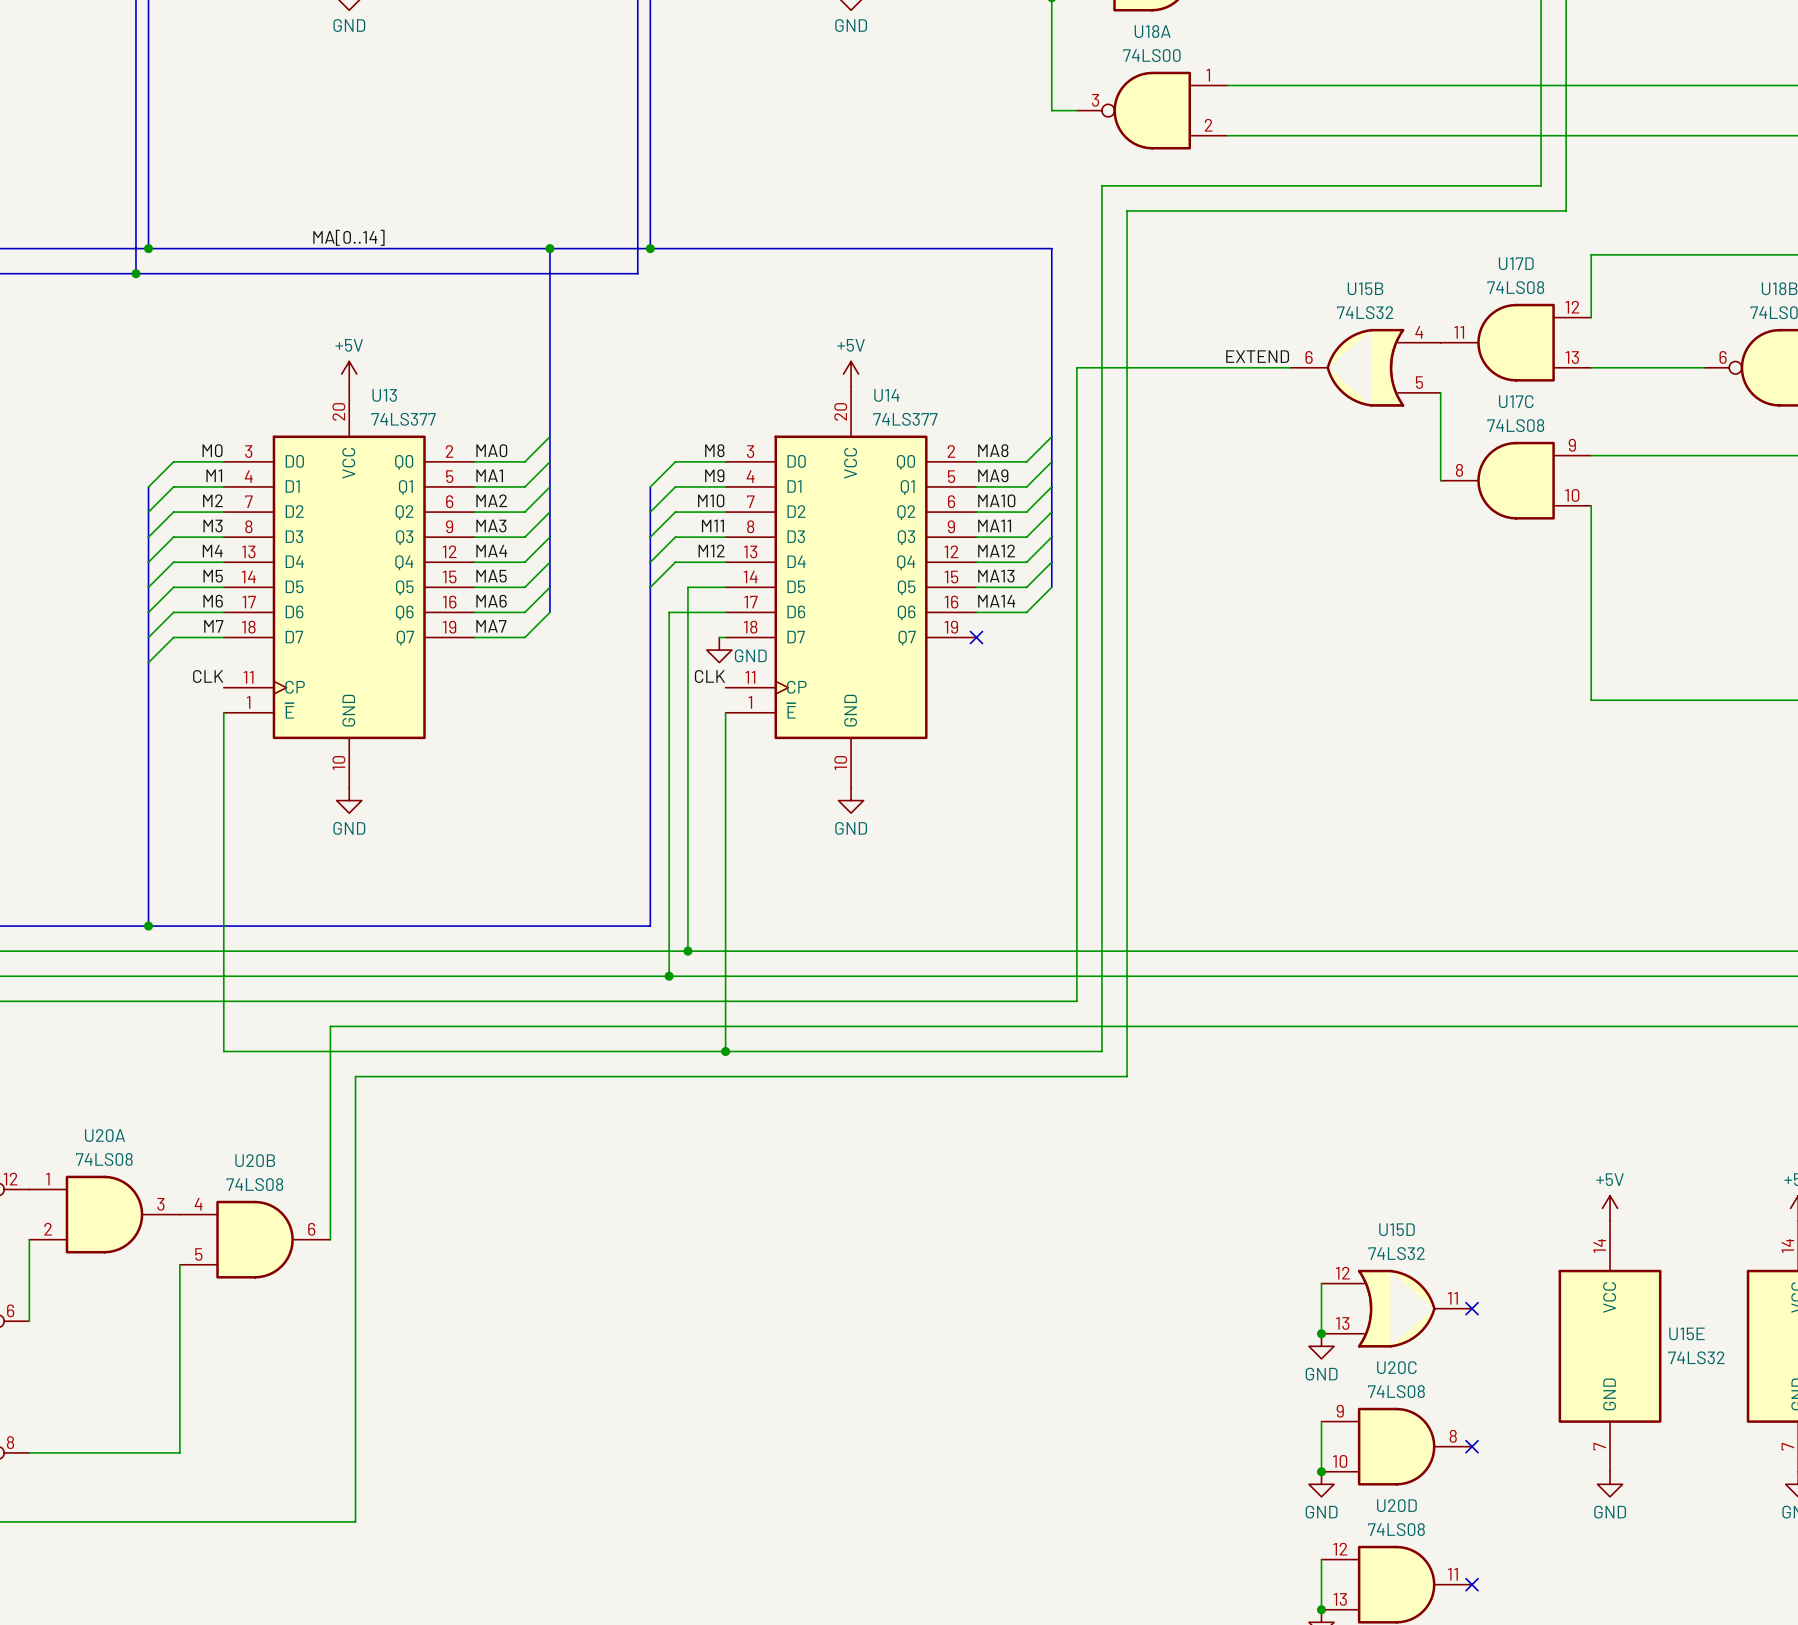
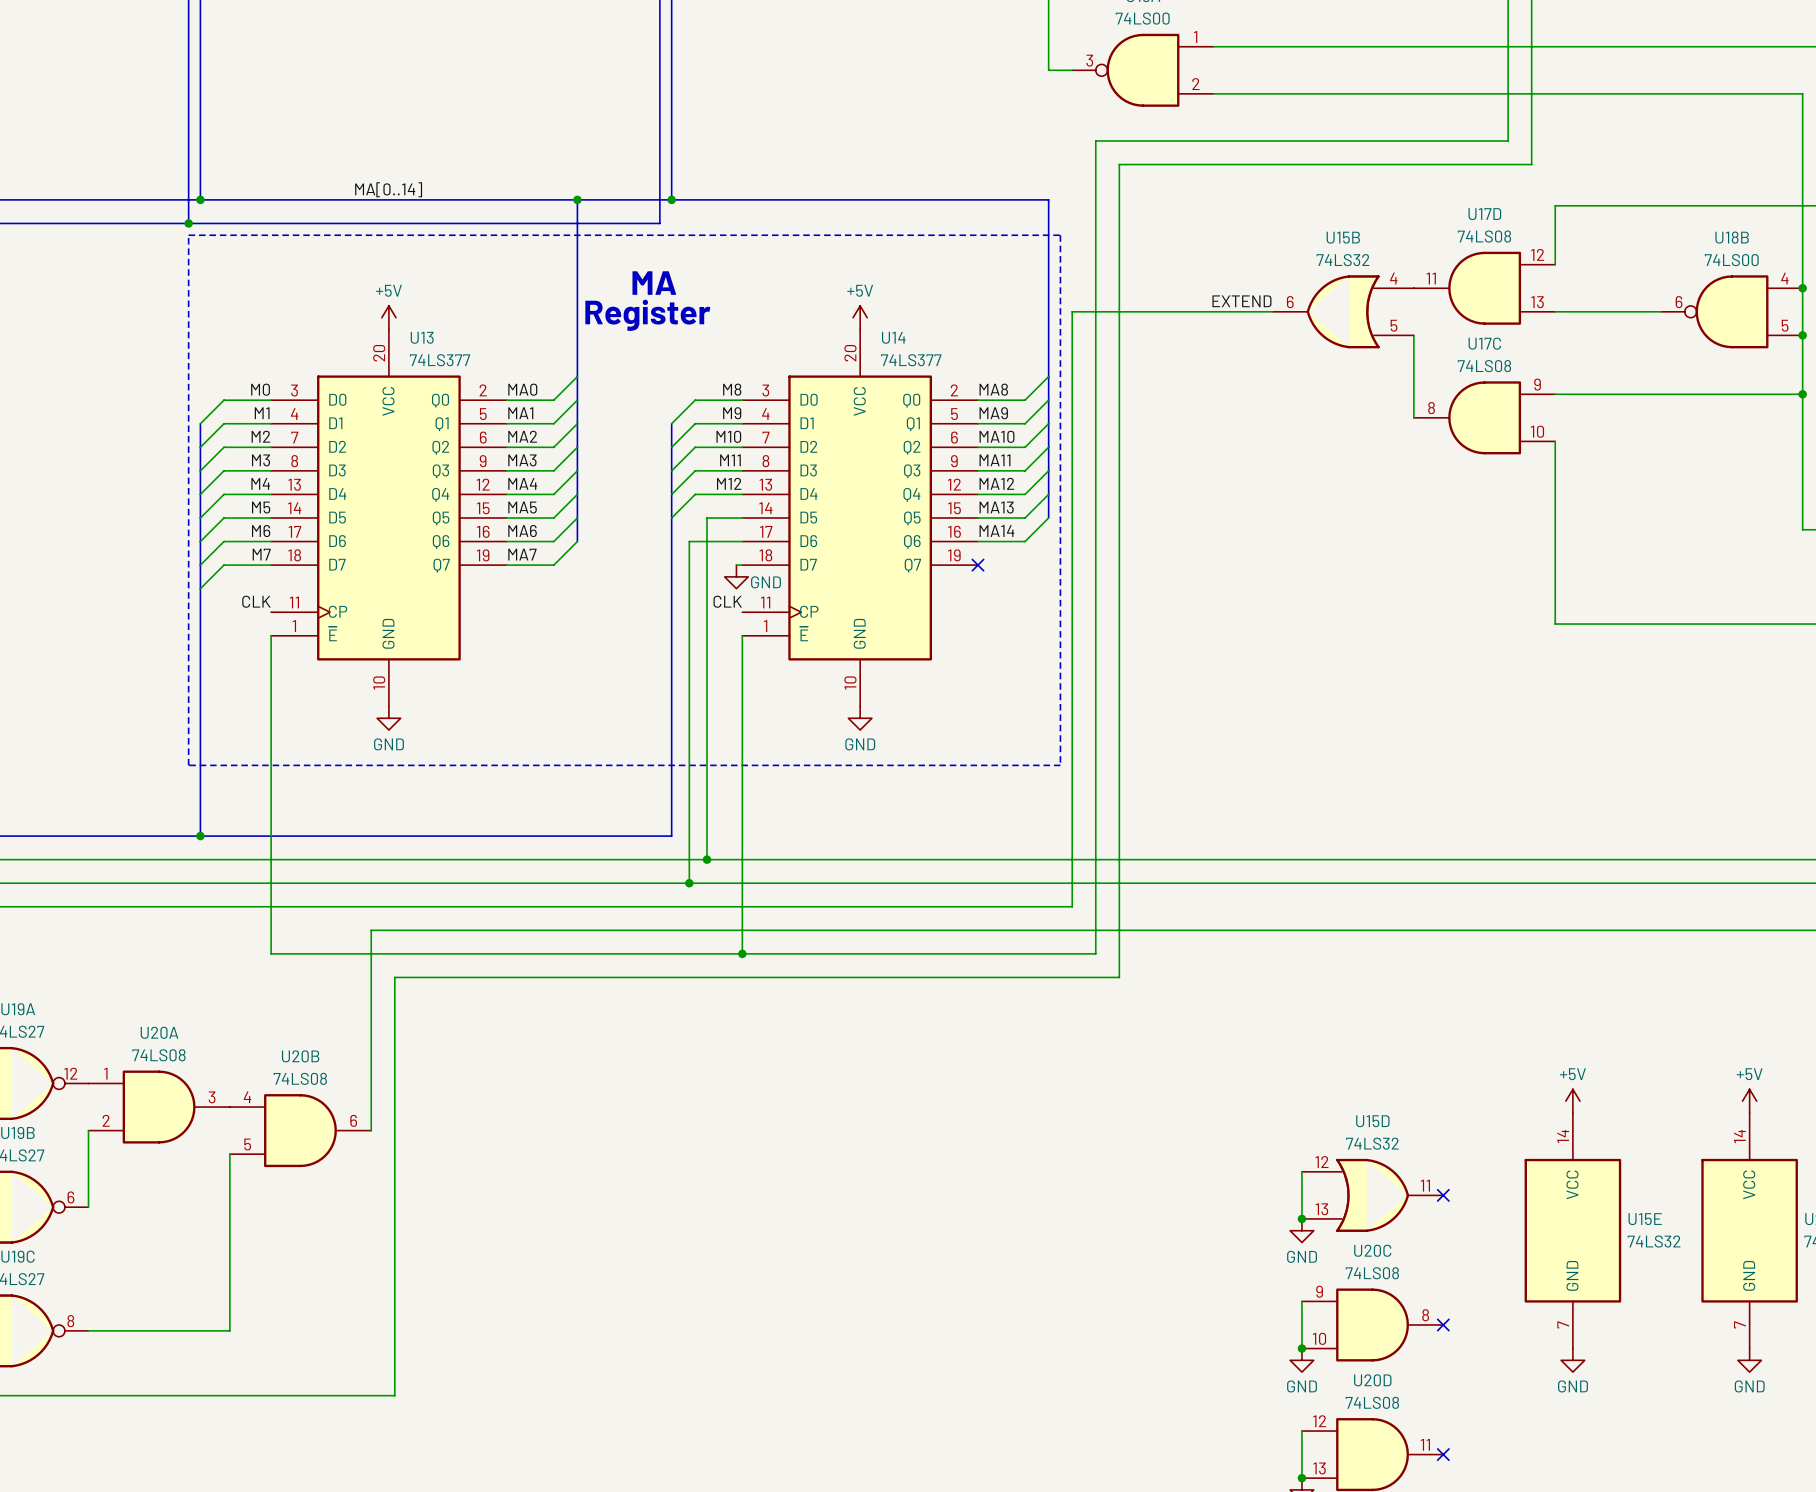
line: none -> (188, 235) (1060, 235) (1060, 765) (188, 765) (188, 235)
text: none -> MA (654, 283)
text: none -> Register (647, 315)

